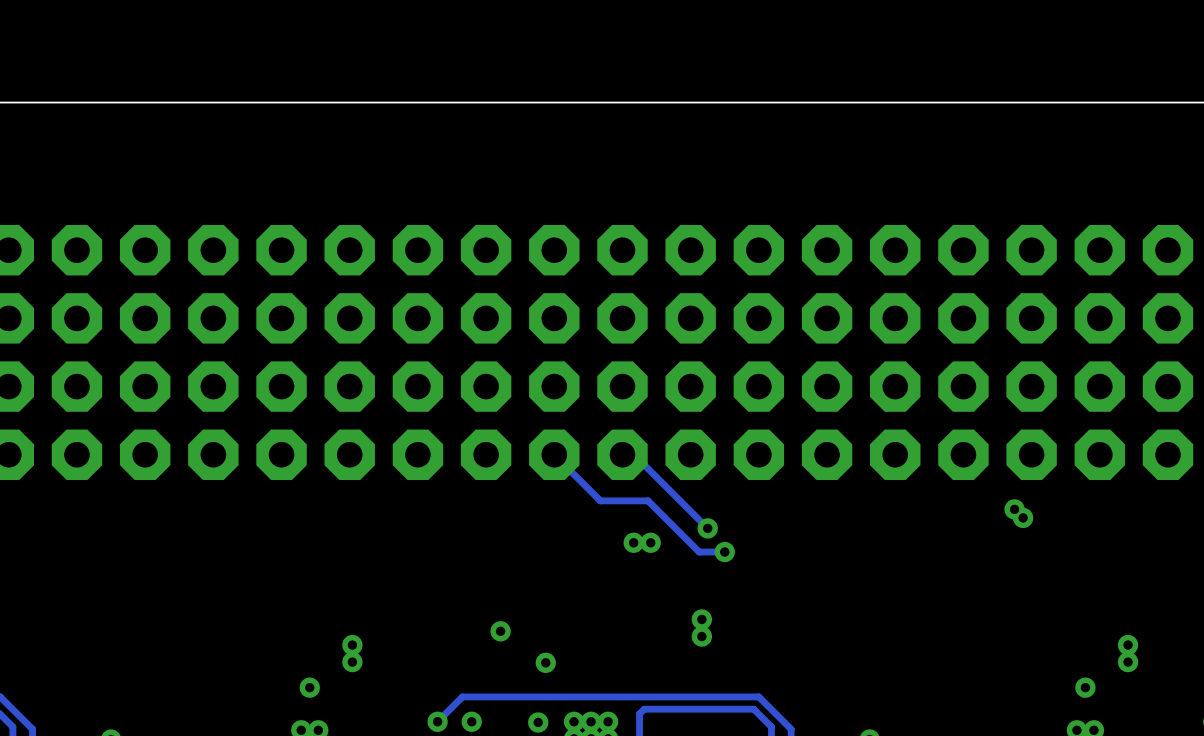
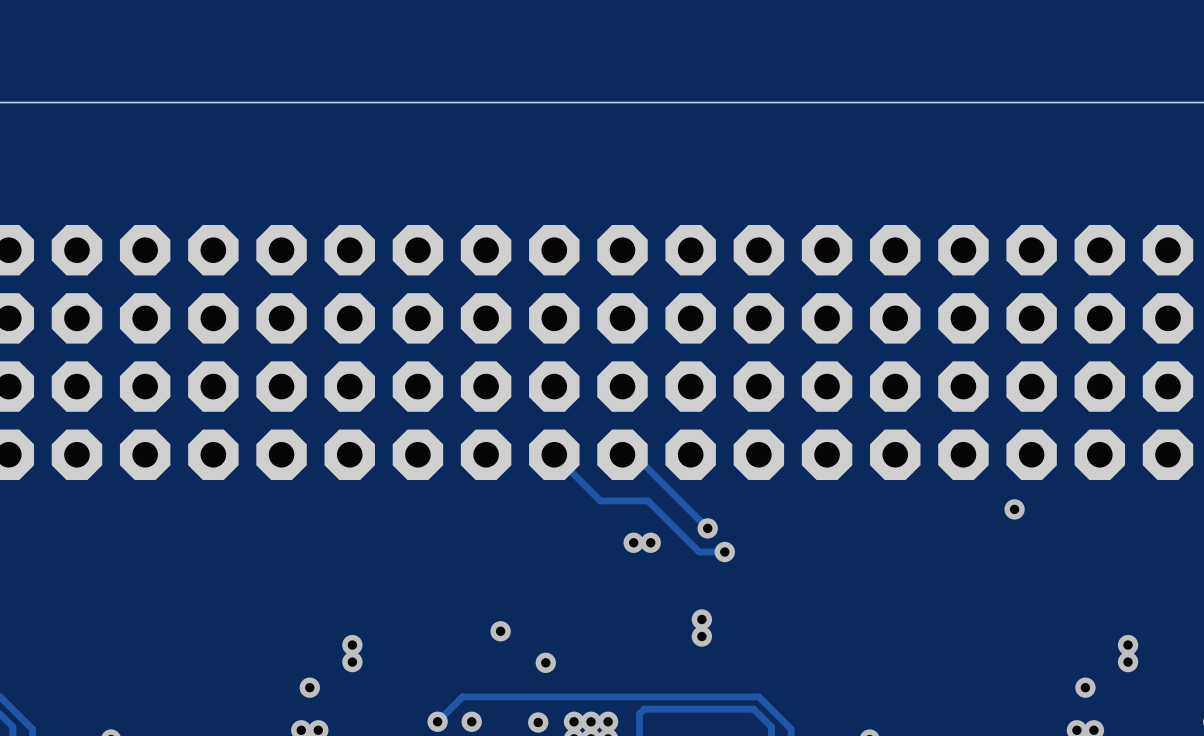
via: (1023, 517) -> none

